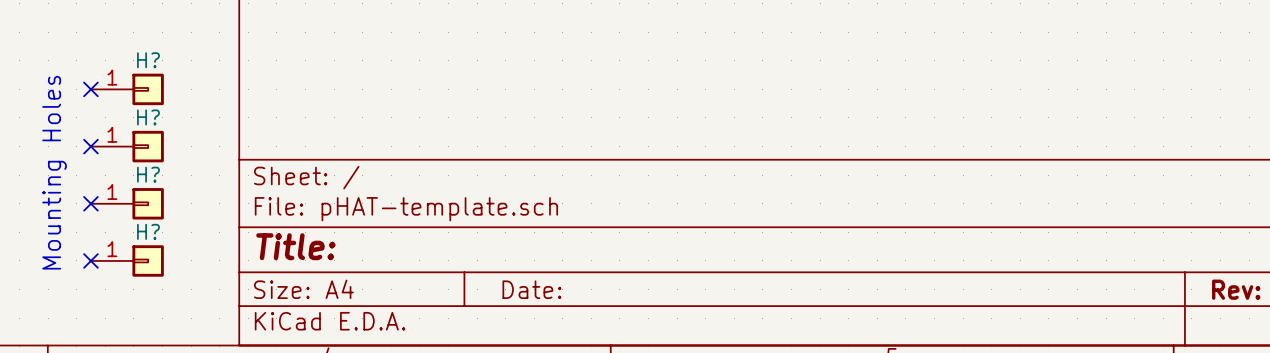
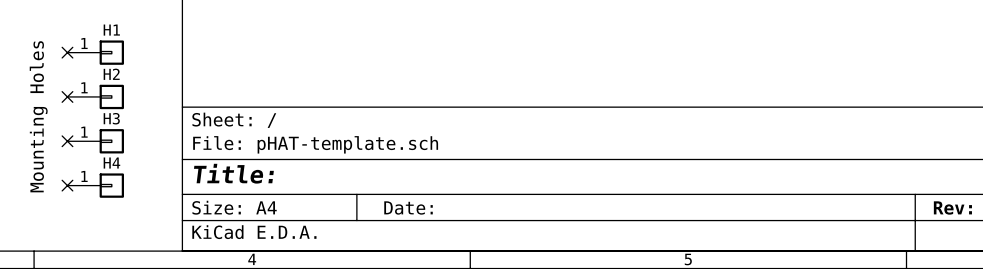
H? name: H? (148, 60) -> H1 (111, 30)
H? name: H? (148, 117) -> H2 (111, 74)
H? name: H? (148, 174) -> H3 (111, 118)
H? name: H? (148, 231) -> H4 (111, 163)

